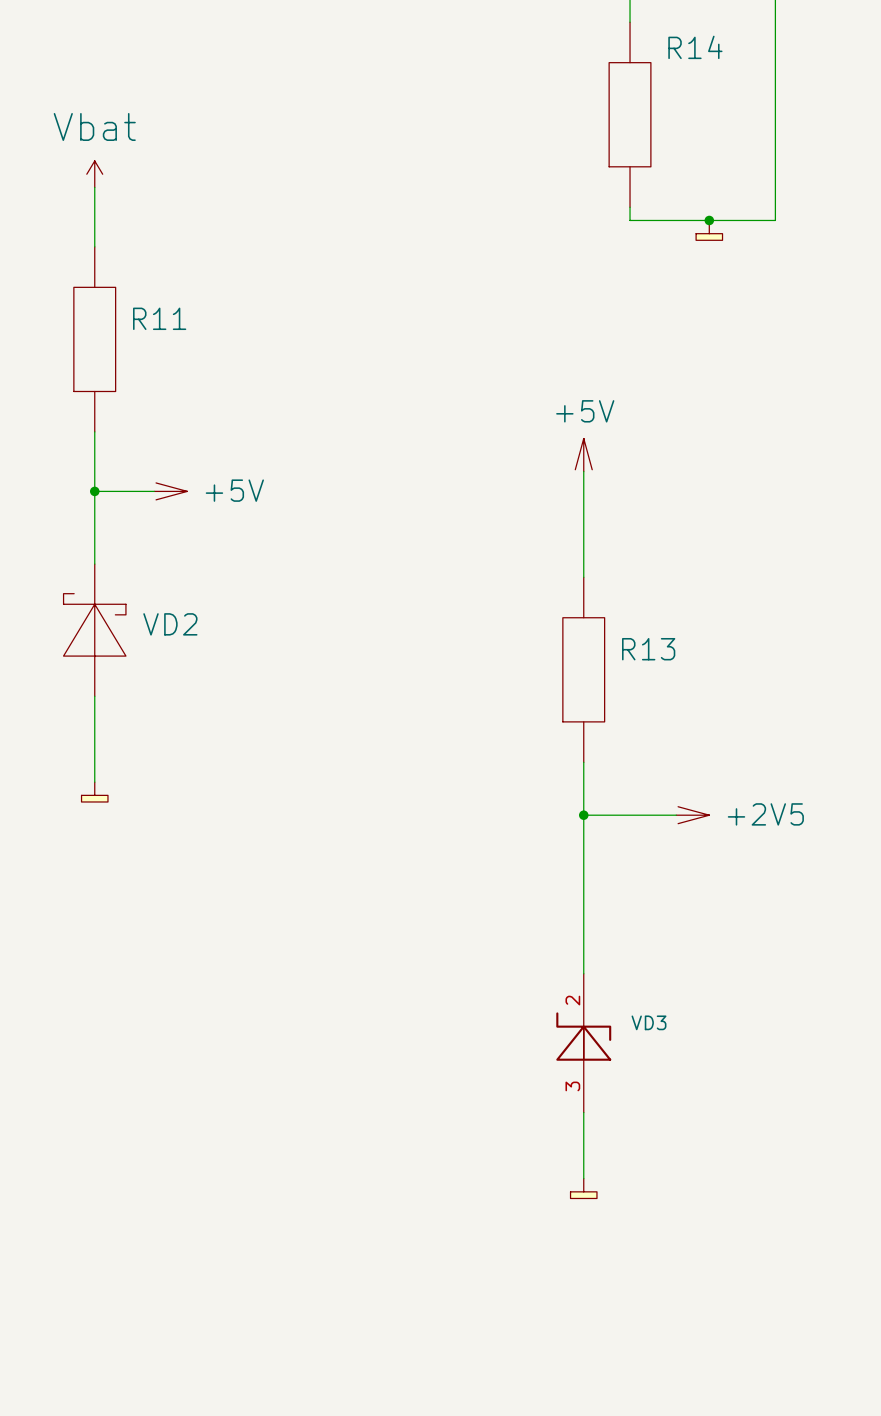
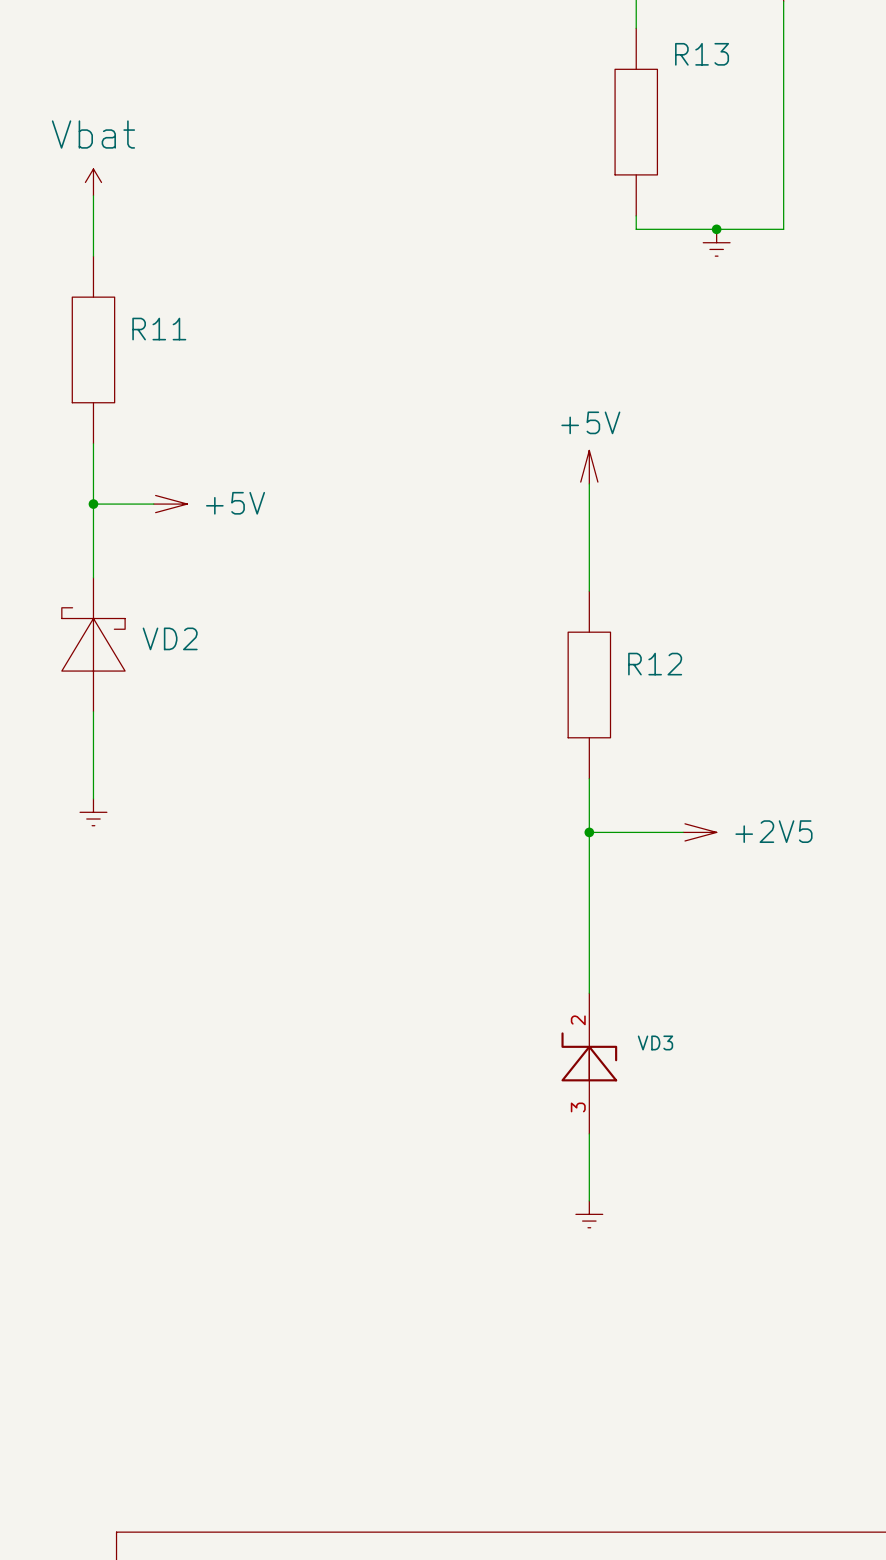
R14 name: R14 (695, 47) -> R13 (702, 54)
power symbol shape: [696, 220, 723, 241] -> [703, 229, 731, 257]
R13 name: R13 (648, 649) -> R12 (655, 664)
power symbol shape: [81, 782, 108, 802] -> [80, 798, 107, 826]
power symbol shape: [570, 1178, 597, 1199] -> [575, 1200, 603, 1228]

